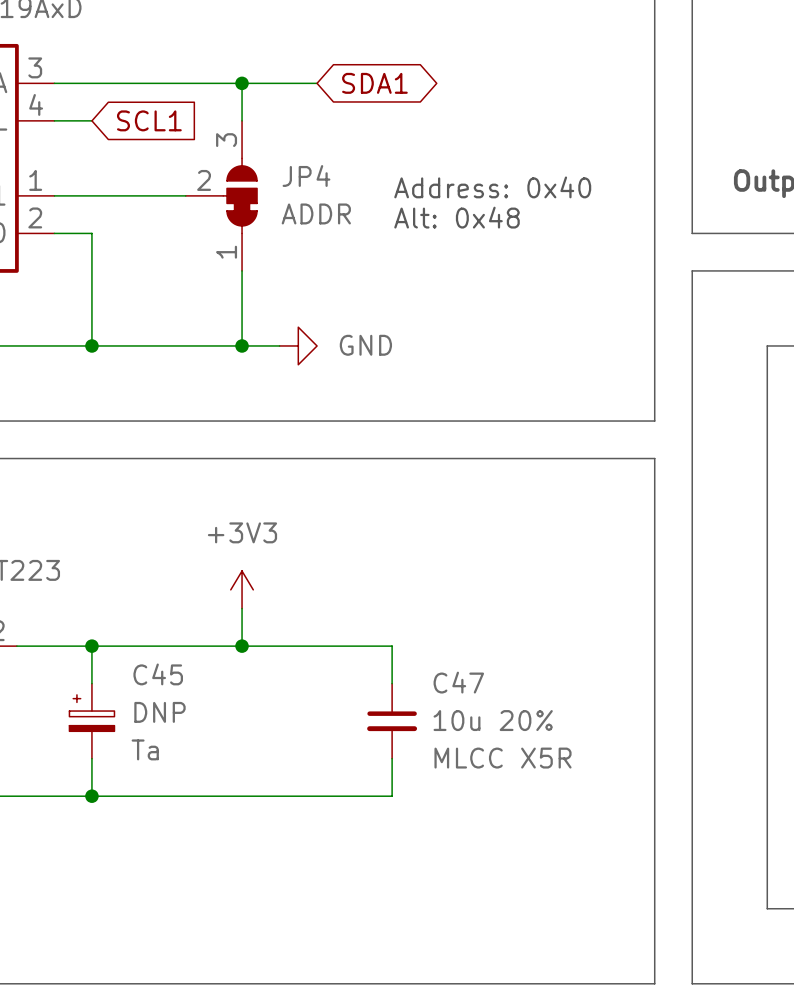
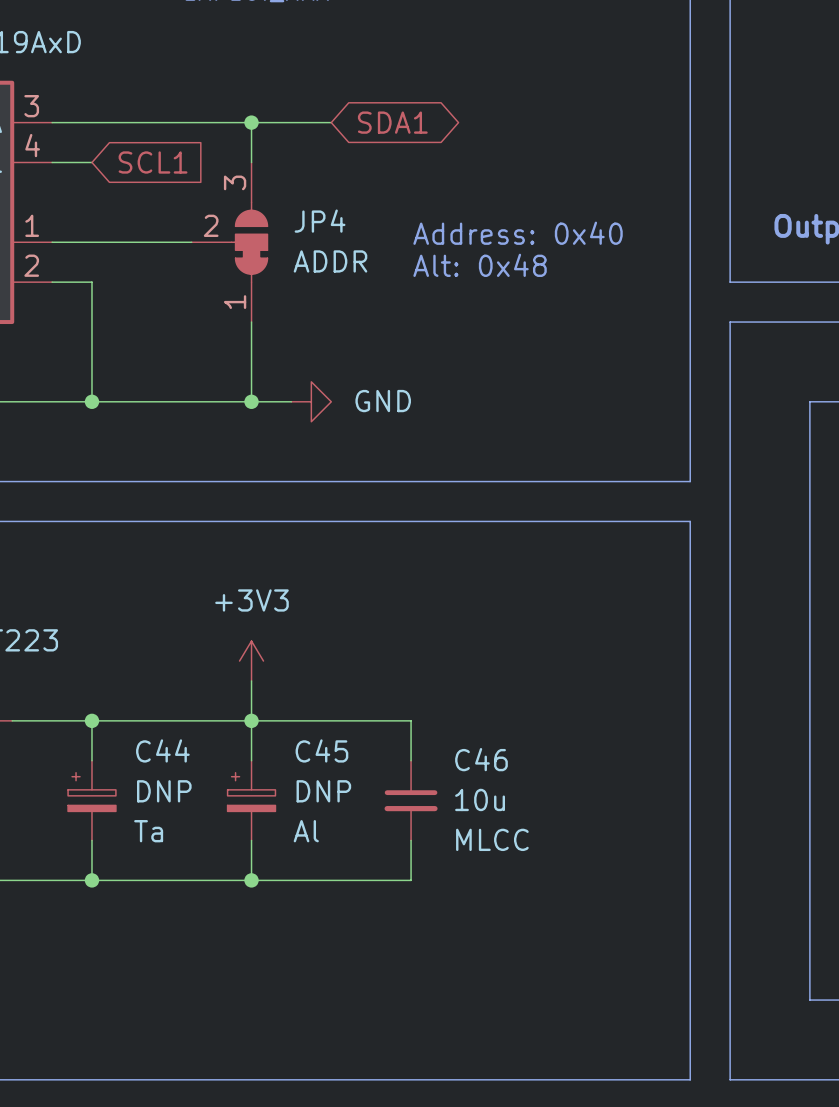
wire: none -> (251, 720) (251, 760)
C45 name: C45 (158, 674) -> C44 (162, 750)
C47 name: C47 (458, 682) -> C46 (481, 759)
C47 value: 10u 20% (493, 720) -> 10u (480, 799)
C45: none -> DNP (251, 800)
wire: none -> (251, 840) (251, 880)
C47 text: MLCC X5R (503, 758) -> MLCC (492, 839)
junction: none -> (251, 880)

